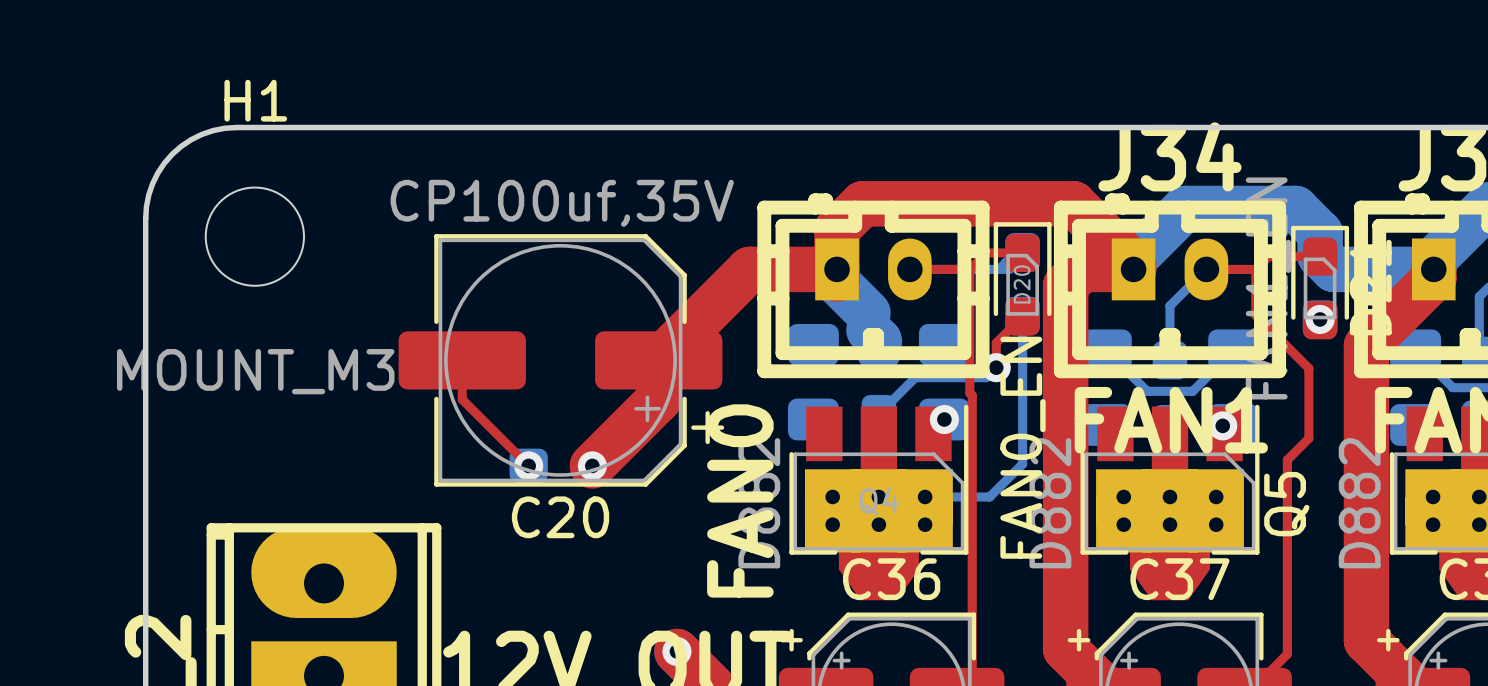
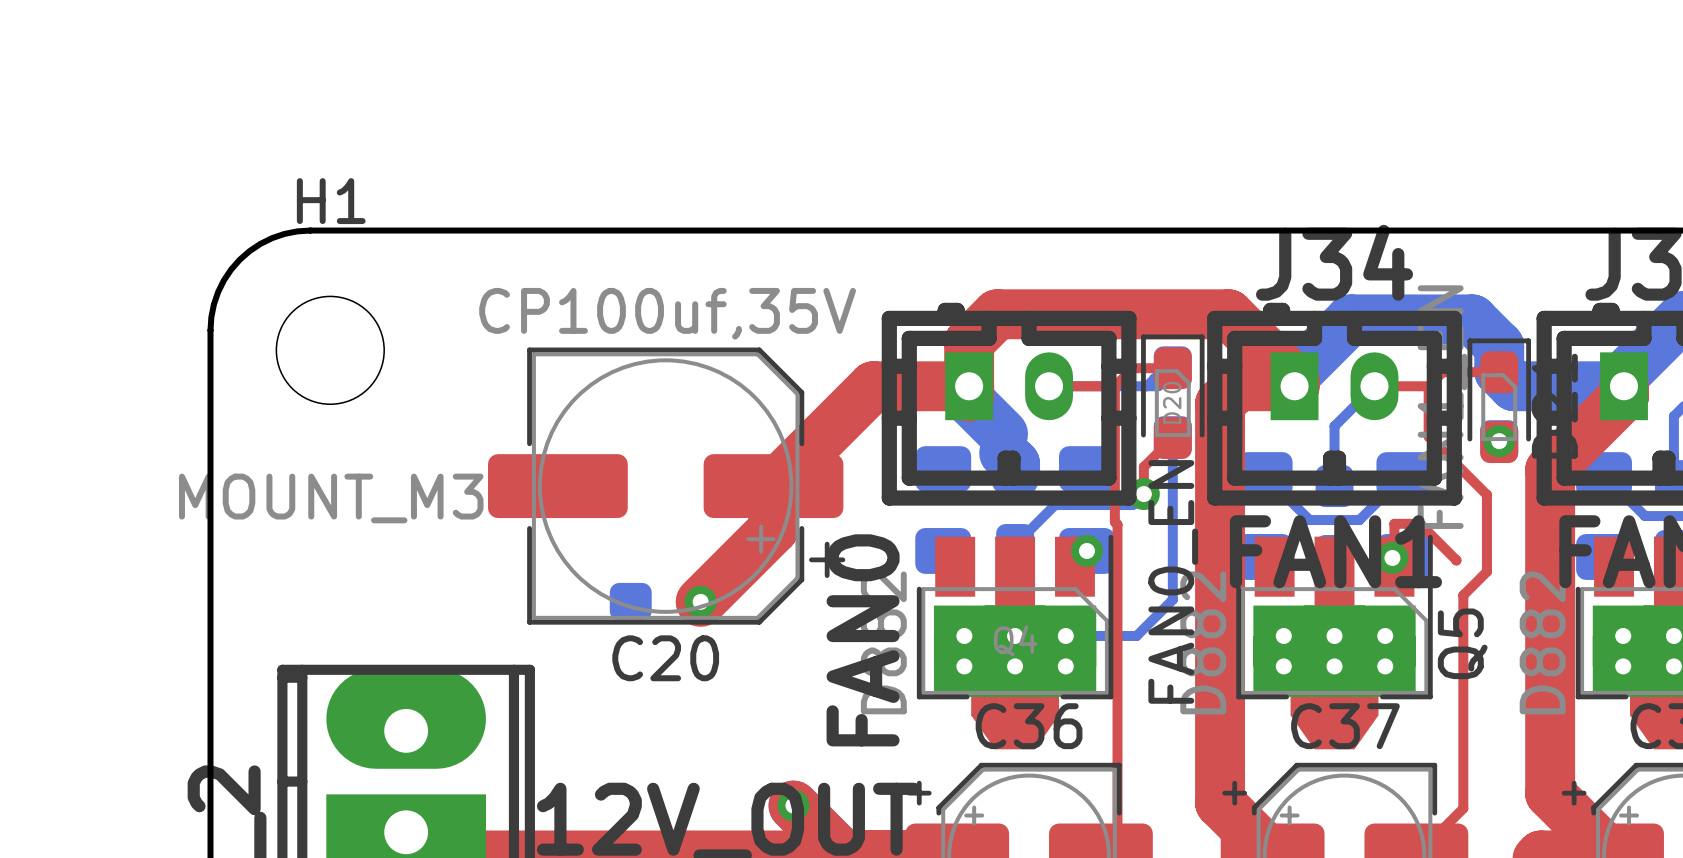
top track: (462, 360) (462, 399) (528, 465) -> none
top track: none -> (1394, 559) (1394, 523) (1419, 523) (1456, 560)
via: (528, 465) -> none

